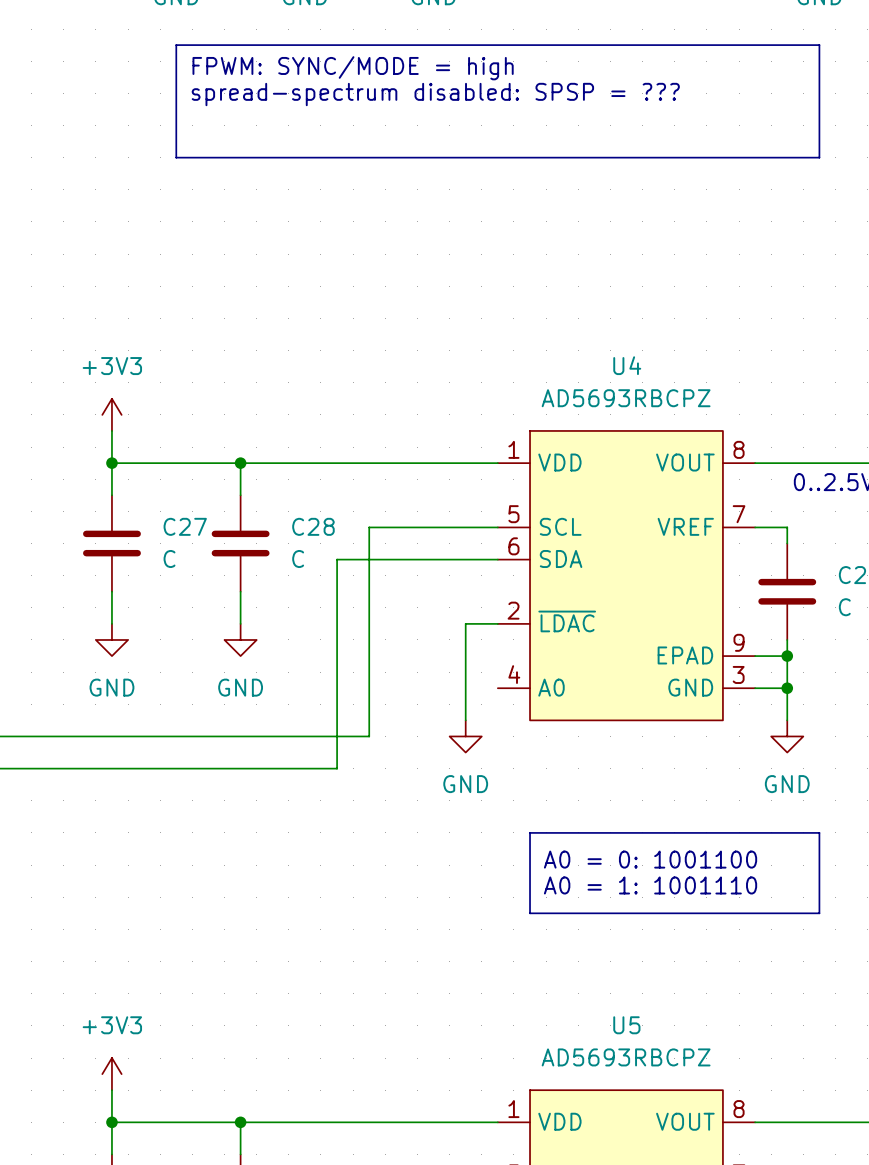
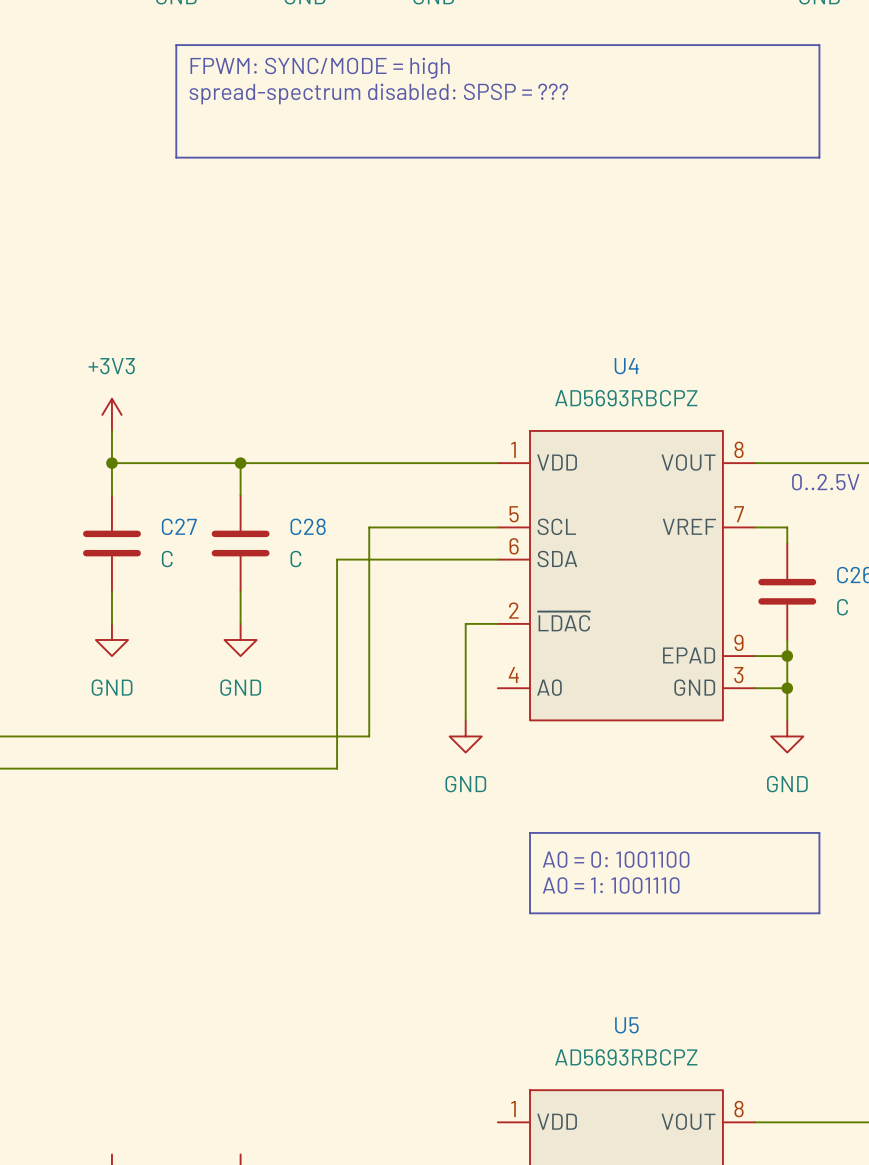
power symbol: +3V3 (111, 1074) -> none
wire: (111, 1090) (111, 1154) -> none
wire: (111, 1122) (497, 1122) -> none
junction: (111, 1122) -> none
wire: (240, 1122) (240, 1154) -> none
junction: (240, 1122) -> none

